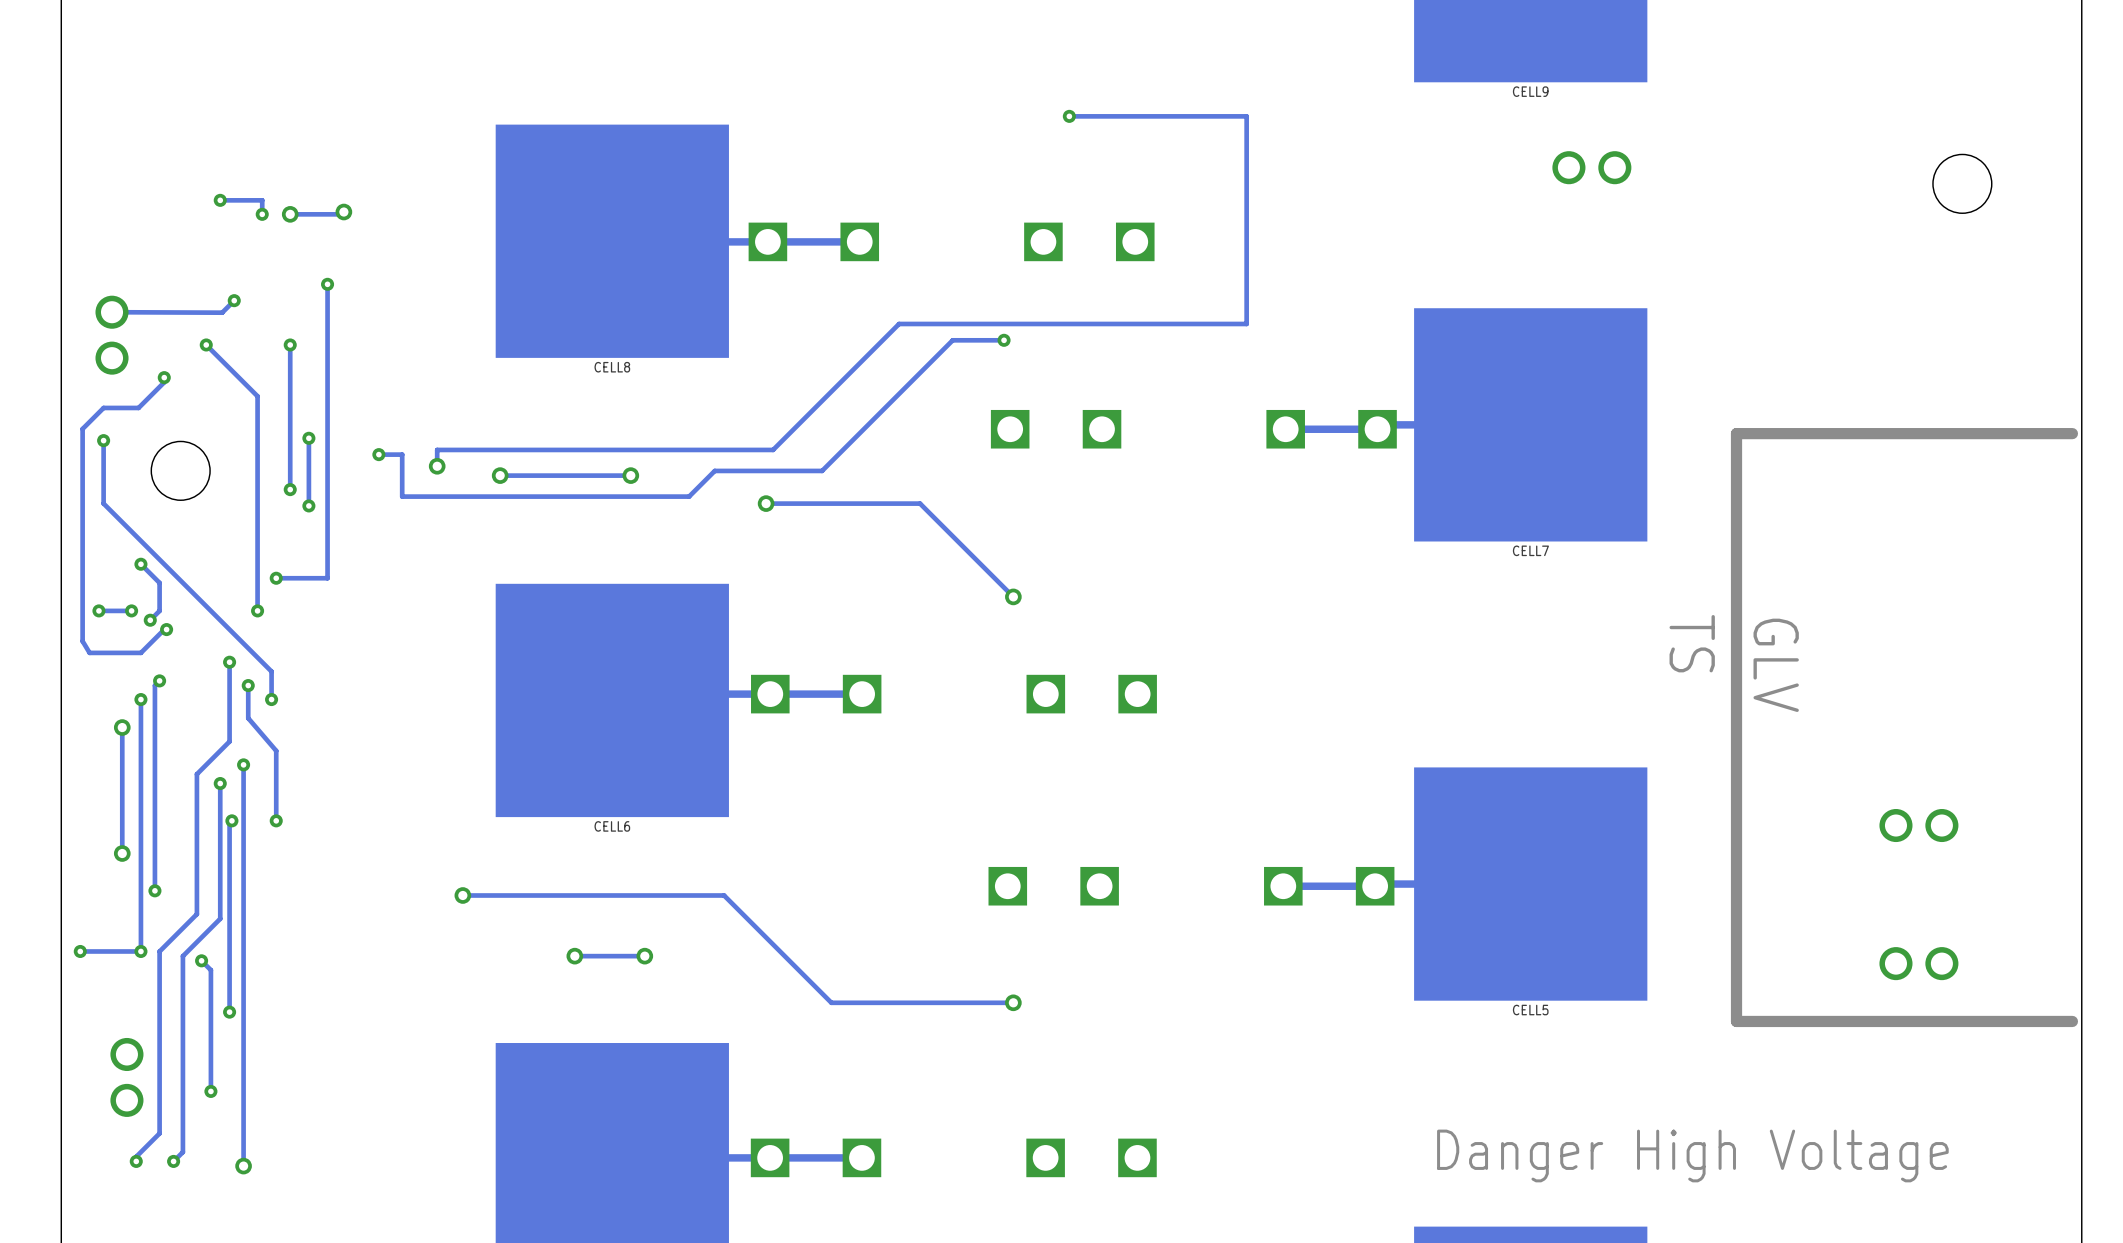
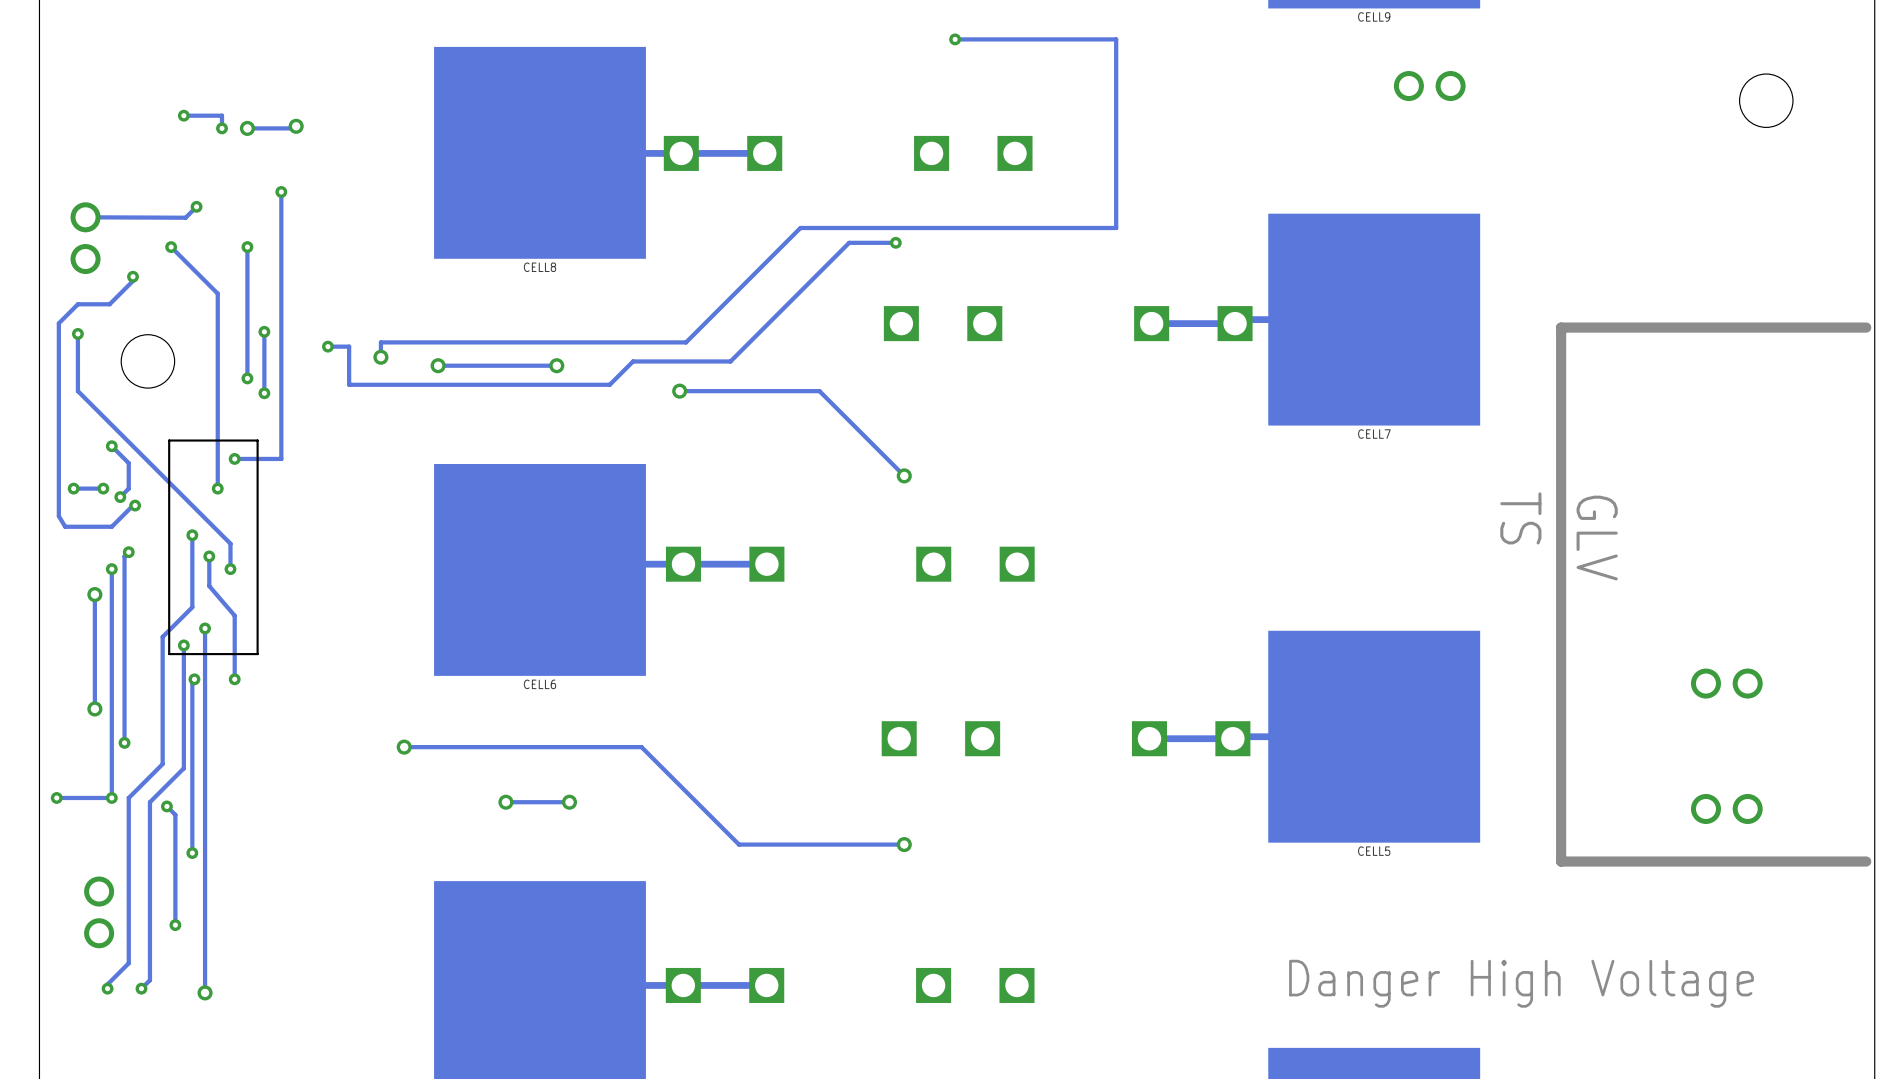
part: none -> (213, 547)

